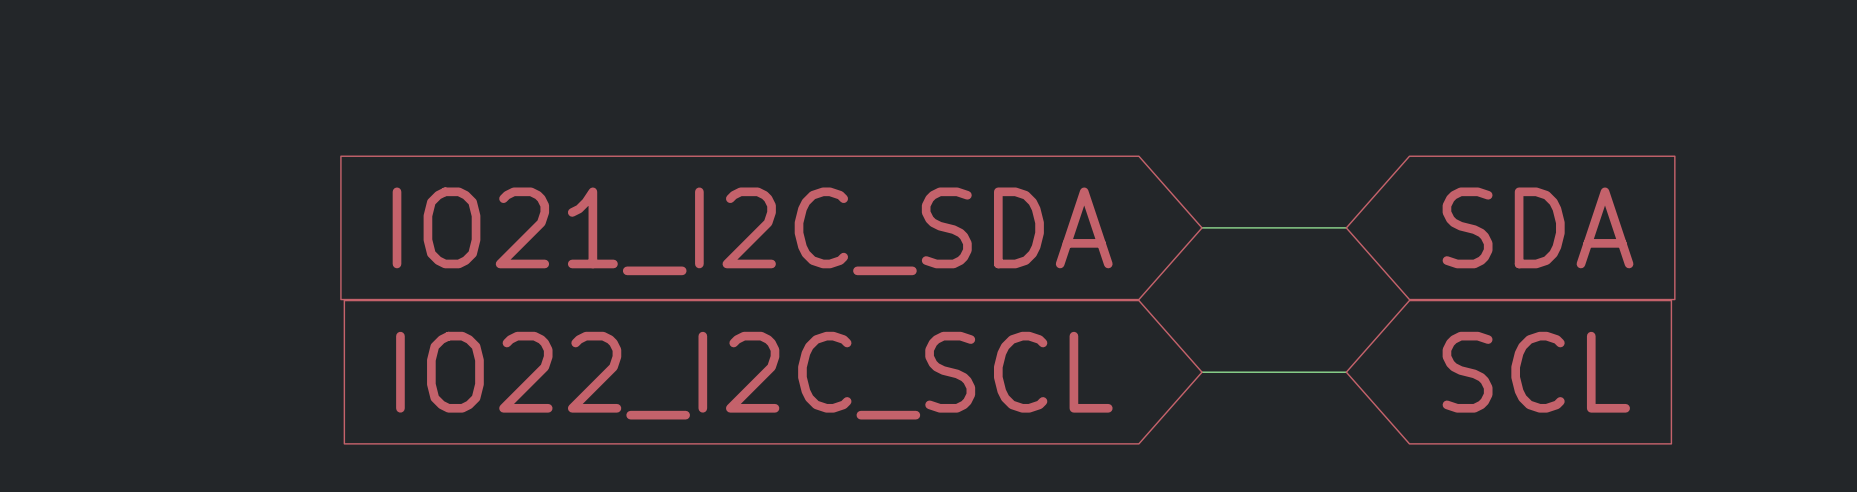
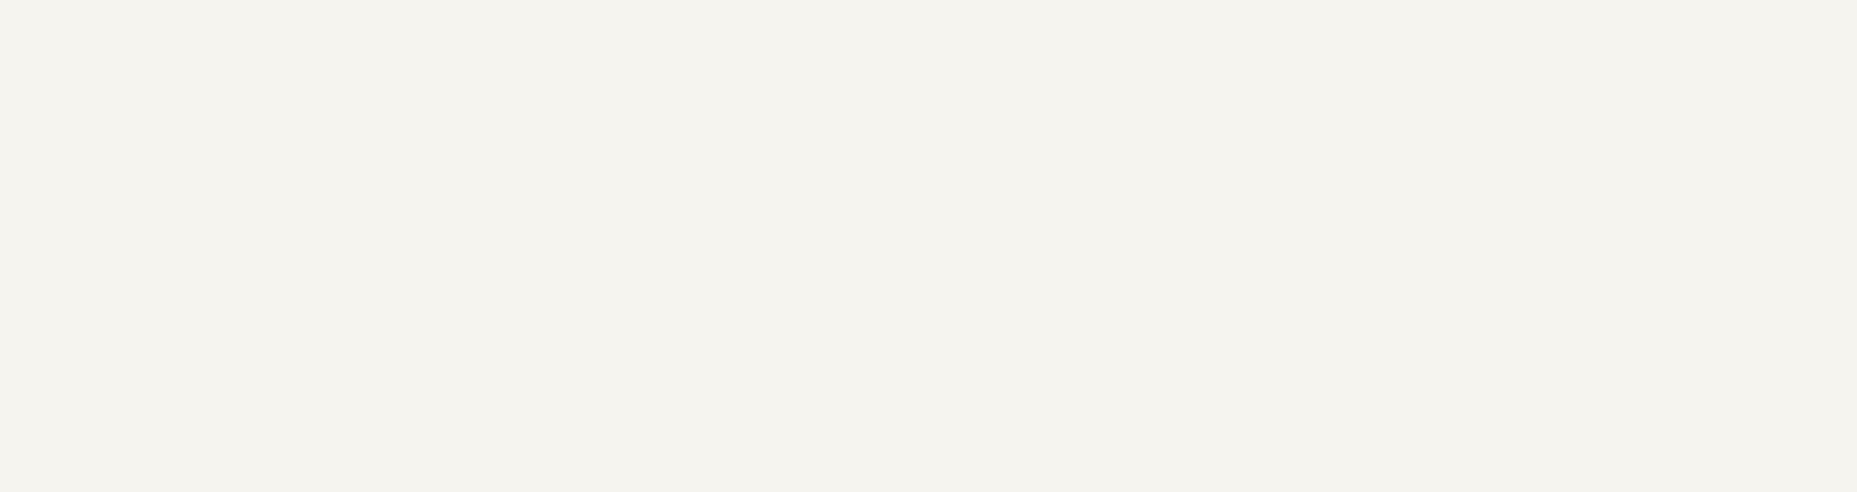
wire: (1202, 227) (1346, 227) -> none
global label: SDA (1538, 227) -> none
global label: IO21_I2C_SDA (752, 231) -> none
wire: (1202, 372) (1346, 372) -> none
global label: SCL (1536, 372) -> none
global label: IO22_I2C_SCL (754, 375) -> none

